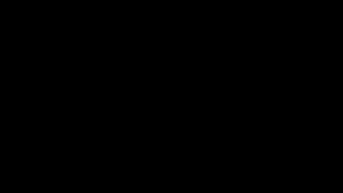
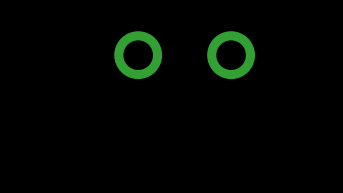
part: none -> (184, 55)

